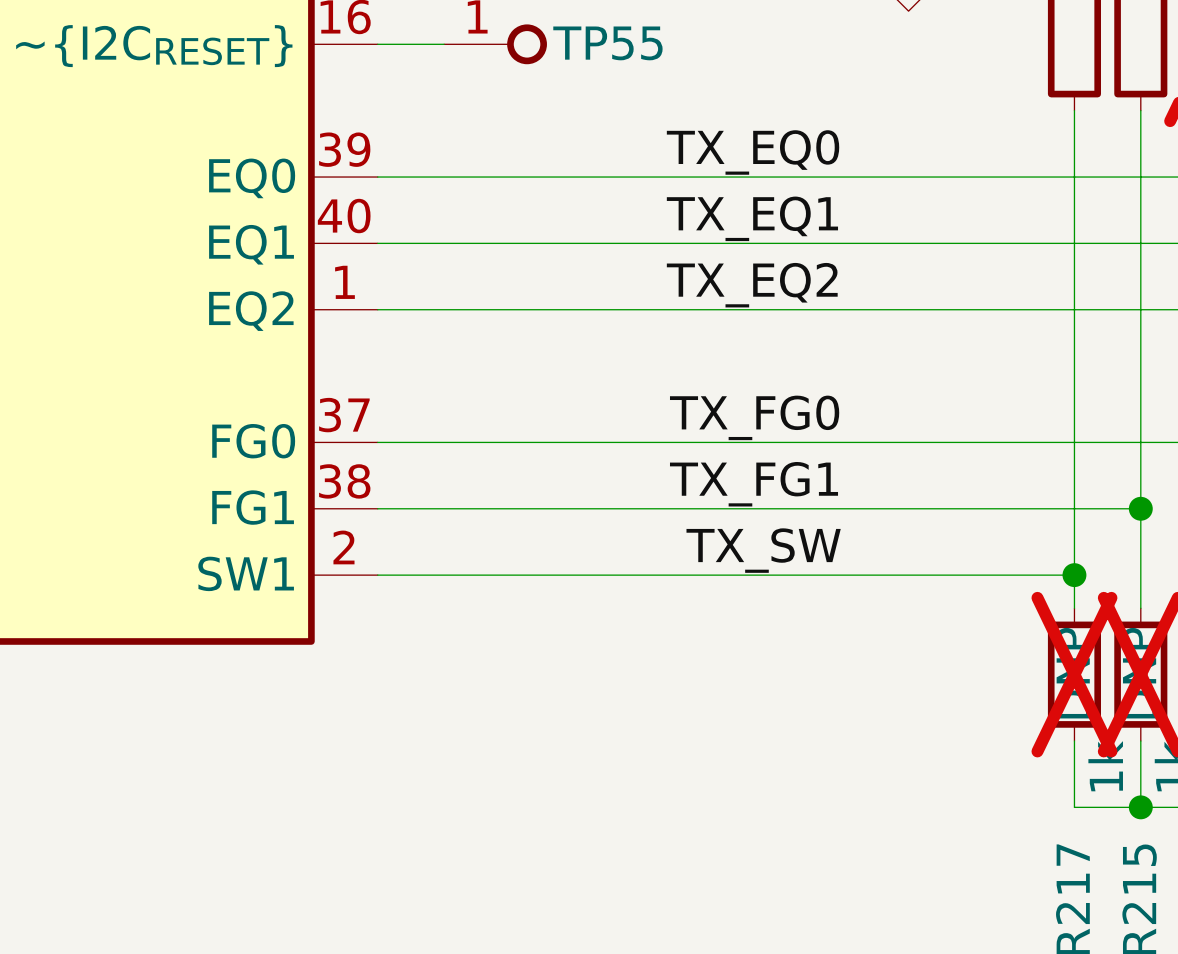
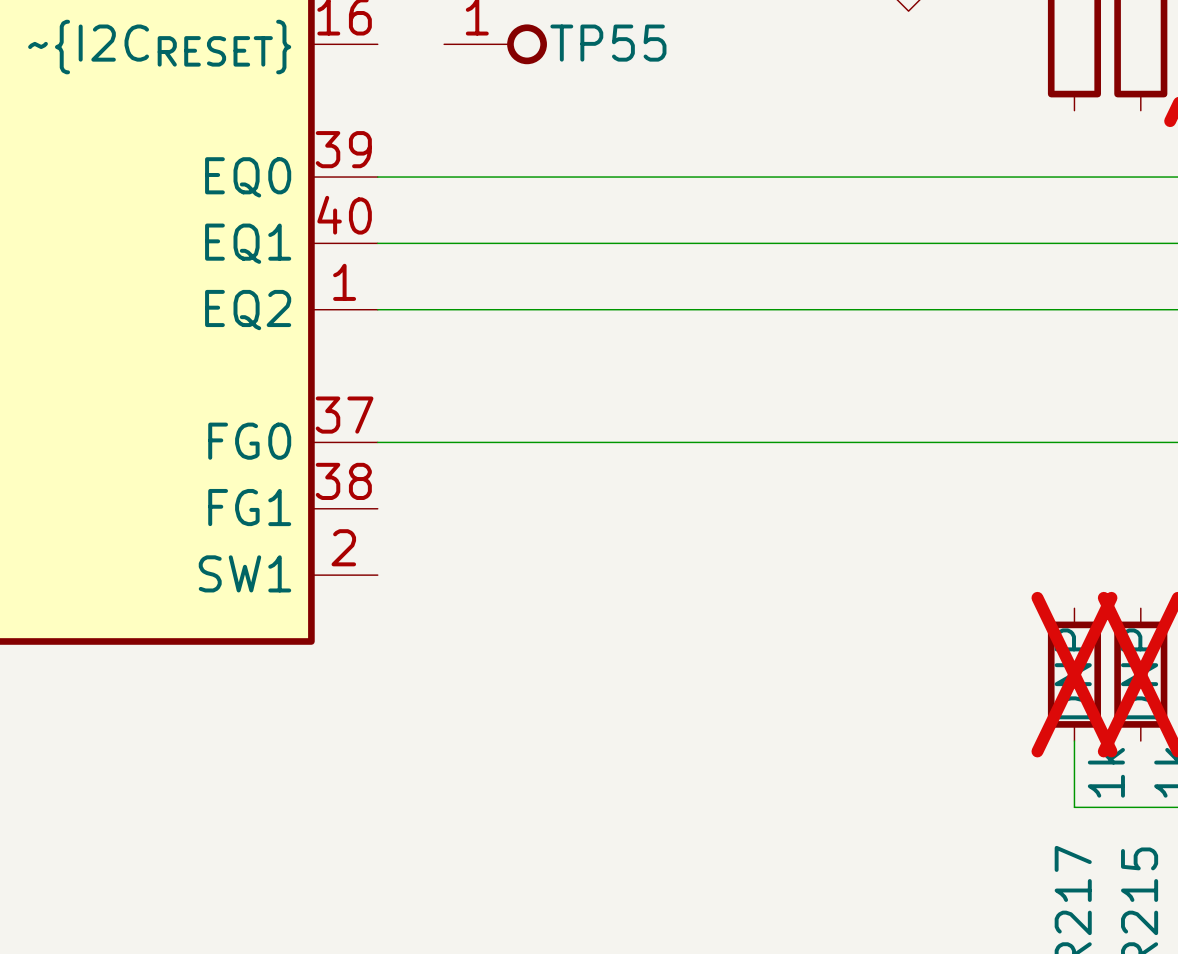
wire: (377, 44) (444, 44) -> none
wire: (1074, 110) (1074, 608) -> none
wire: (1140, 110) (1140, 608) -> none
label: TX_EQ0 (753, 152) -> none
label: TX_EQ1 (752, 218) -> none
label: TX_EQ2 (752, 285) -> none
label: TX_FG0 (754, 417) -> none
label: TX_FG1 (754, 484) -> none
wire: (377, 508) (1140, 508) -> none
junction: (1140, 508) -> none
label: TX_SW (763, 550) -> none
wire: (377, 575) (1074, 575) -> none
junction: (1074, 575) -> none
wire: (1140, 741) (1140, 807) -> none
junction: (1140, 807) -> none

